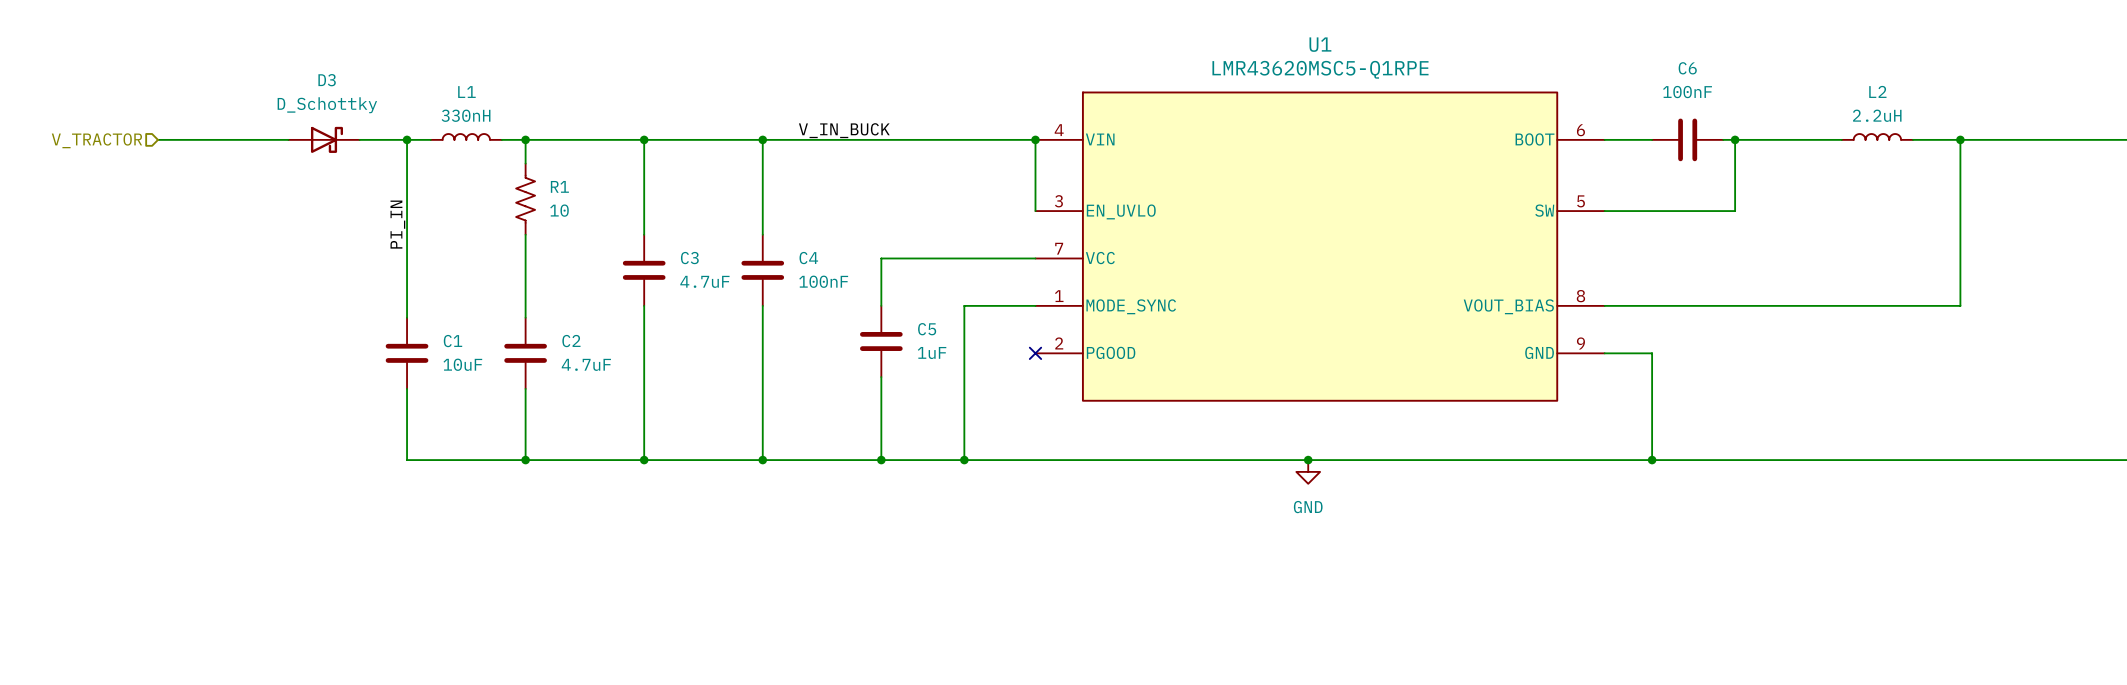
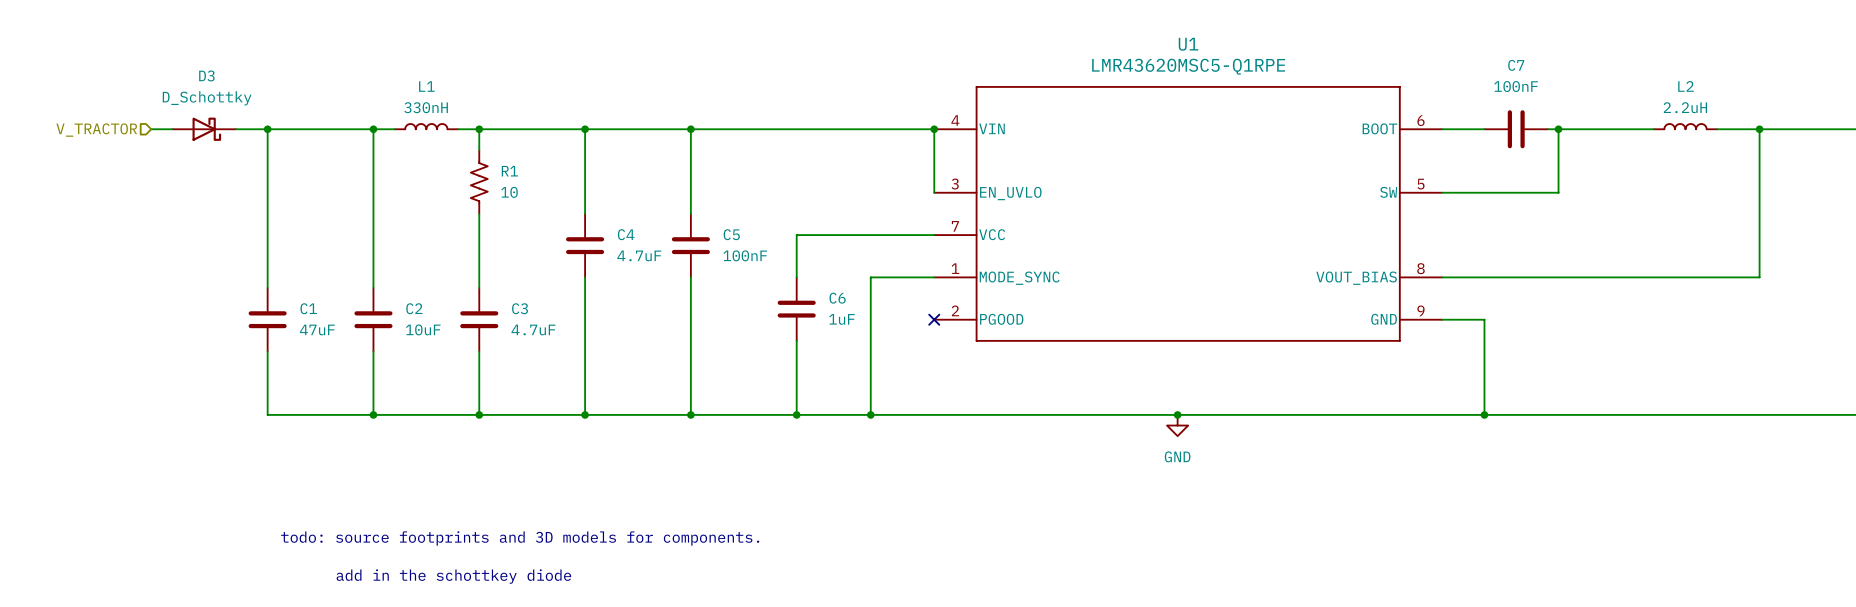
C6 name: C6 (1687, 68) -> C7 (1516, 65)
U1 symbol: [1035, 91, 1605, 402] -> [934, 86, 1443, 342]
label: V_IN_BUCK (844, 130) -> none
junction: none -> (267, 129)
D3 position: (324, 139) -> (204, 129)
D3 flip: as is (326, 139) -> up-down (206, 129)
wire: none -> (331, 129) (267, 129) (267, 287)
label: PI_IN (397, 224) -> none
C3 name: C3 (689, 258) -> C4 (626, 234)
C4 name: C4 (808, 258) -> C5 (731, 234)
C5 name: C5 (927, 329) -> C6 (837, 298)
C1 name: C1 (452, 341) -> C2 (414, 308)
C2 name: C2 (571, 341) -> C3 (520, 308)
C1: none -> 47uF (267, 319)
wire: none -> (267, 351) (267, 414) (373, 414)
junction: none -> (373, 414)
text: none -> todo: source footprints and 3D models for components. (520, 538)
text: none -> add in the schottkey diode (453, 576)

